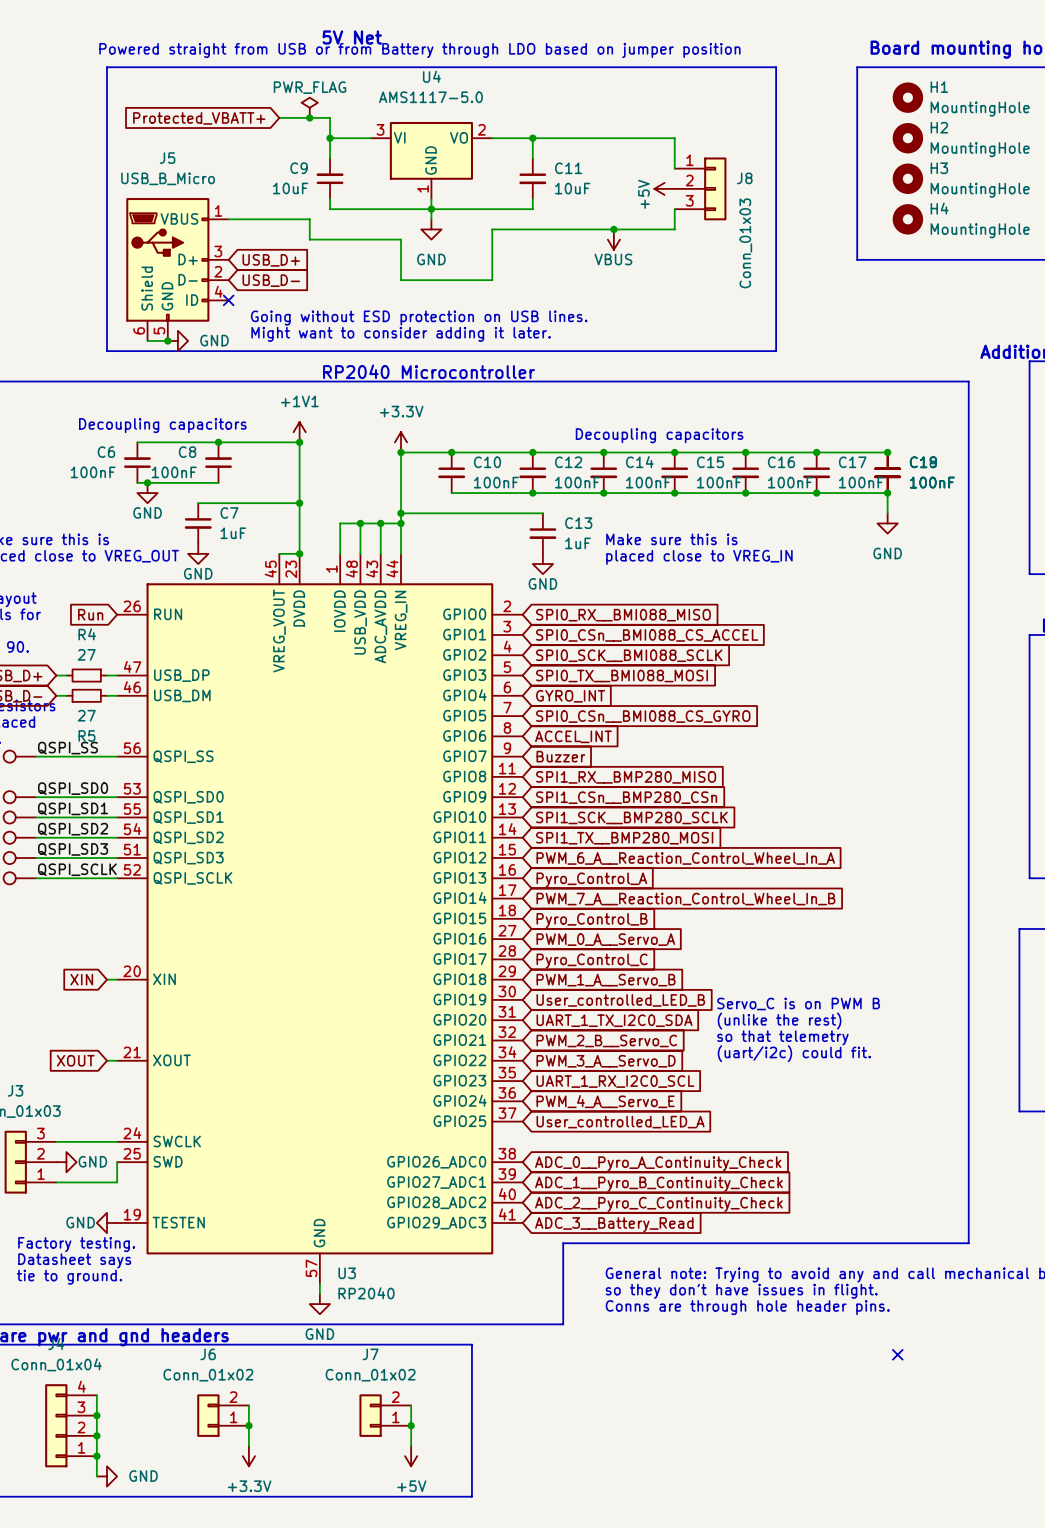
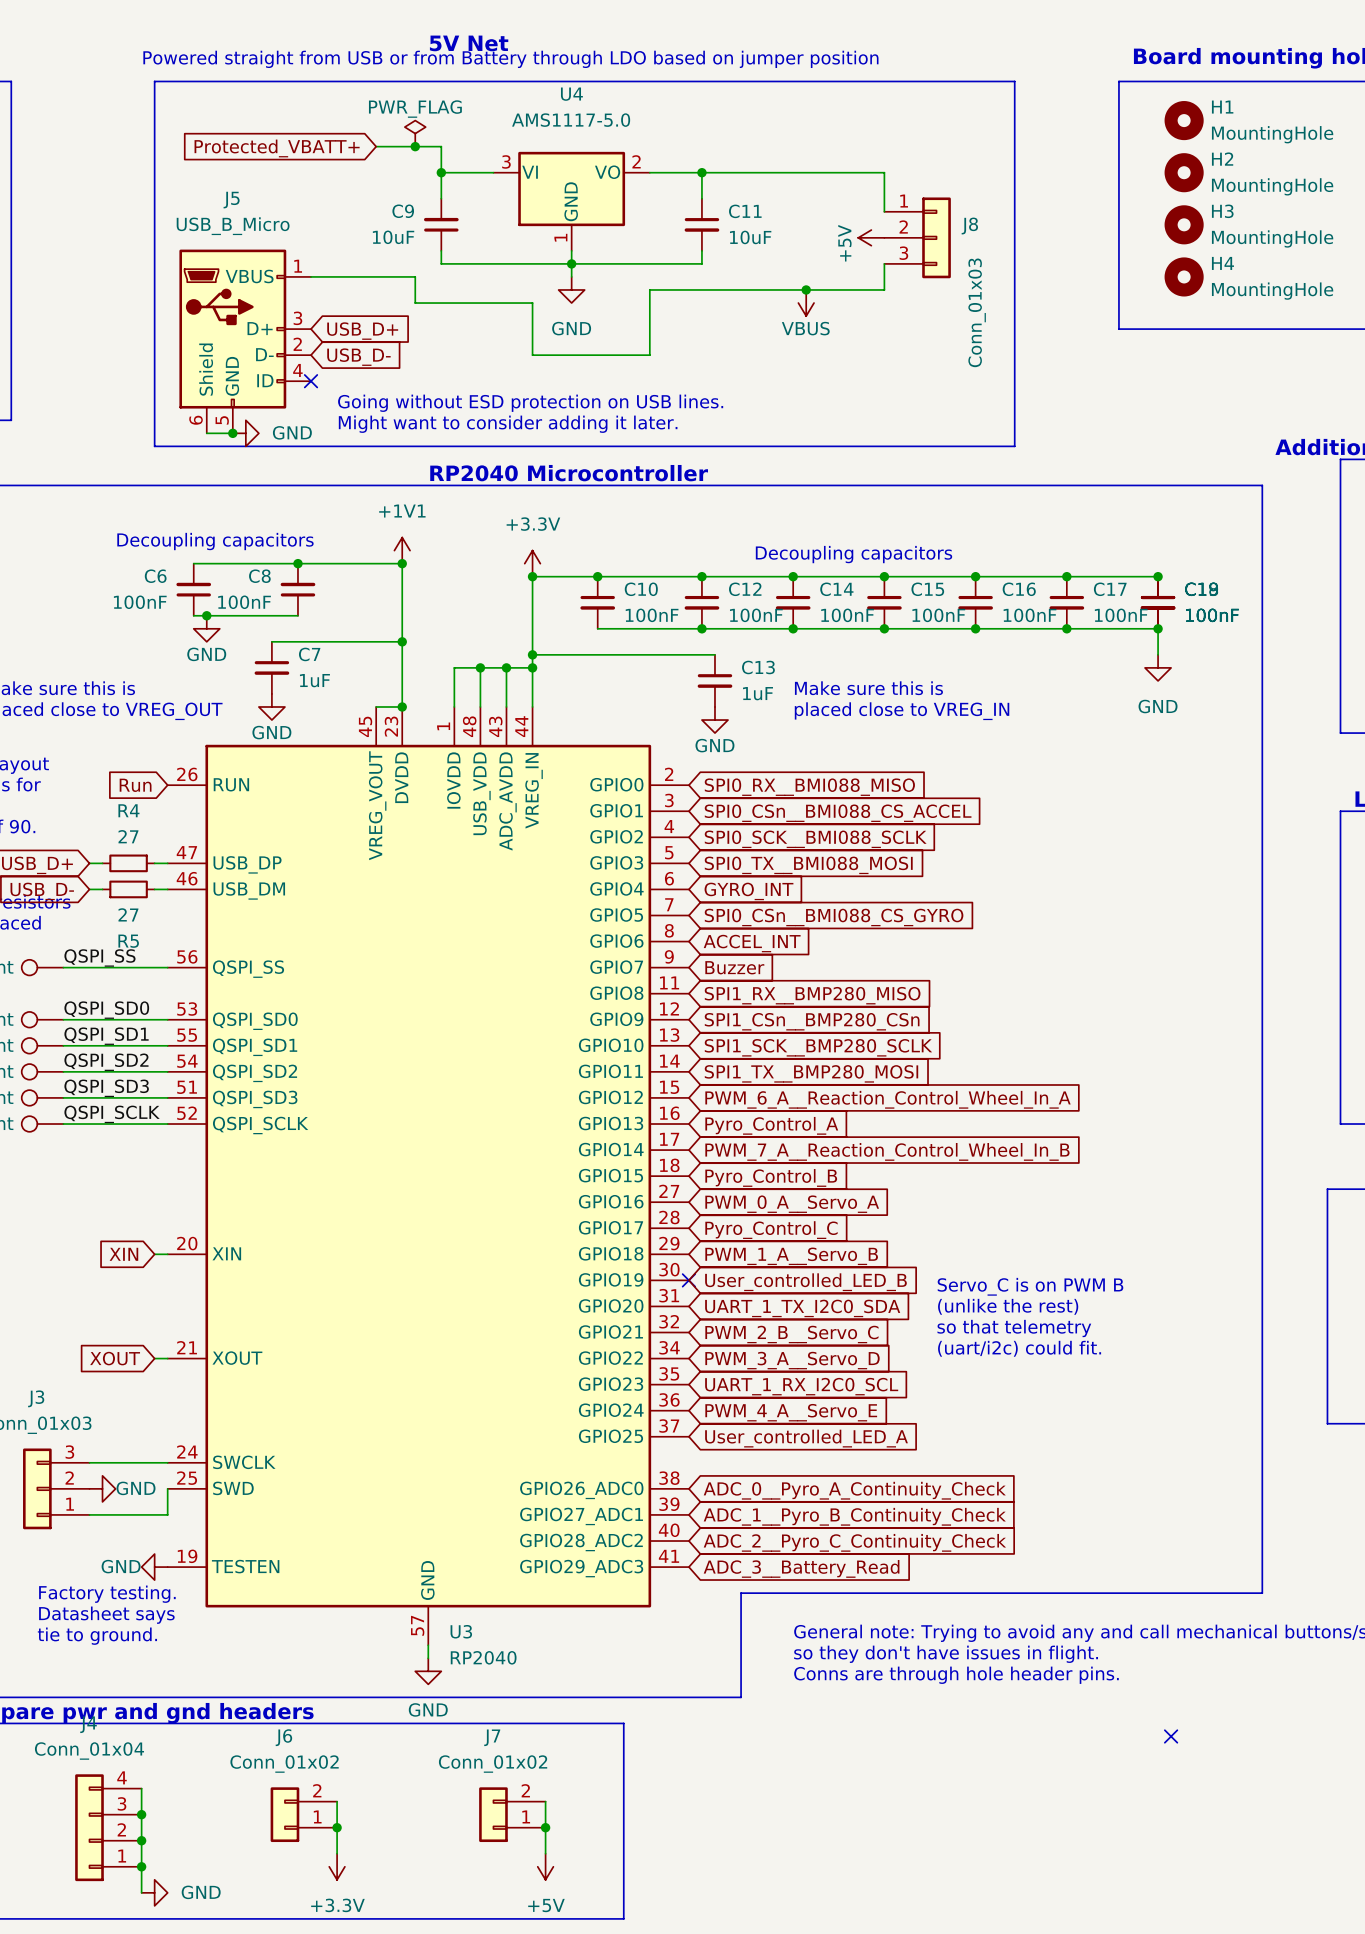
no-connect mark: none -> (688, 1280)

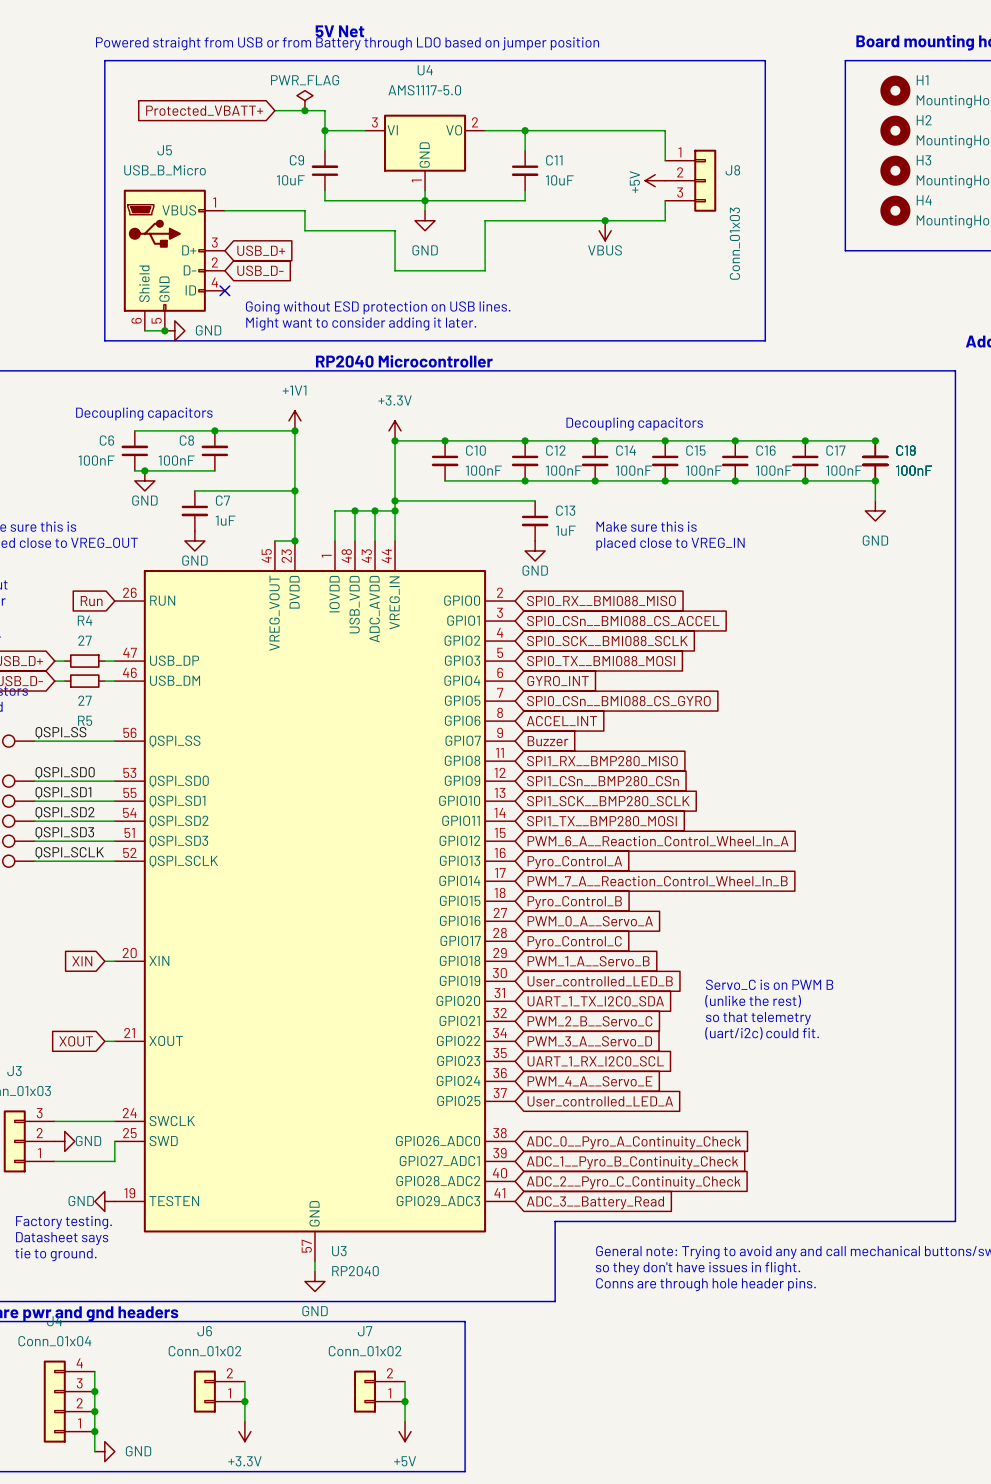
no-connect mark: (688, 1280) -> none
no-connect mark: (1171, 1736) -> none

